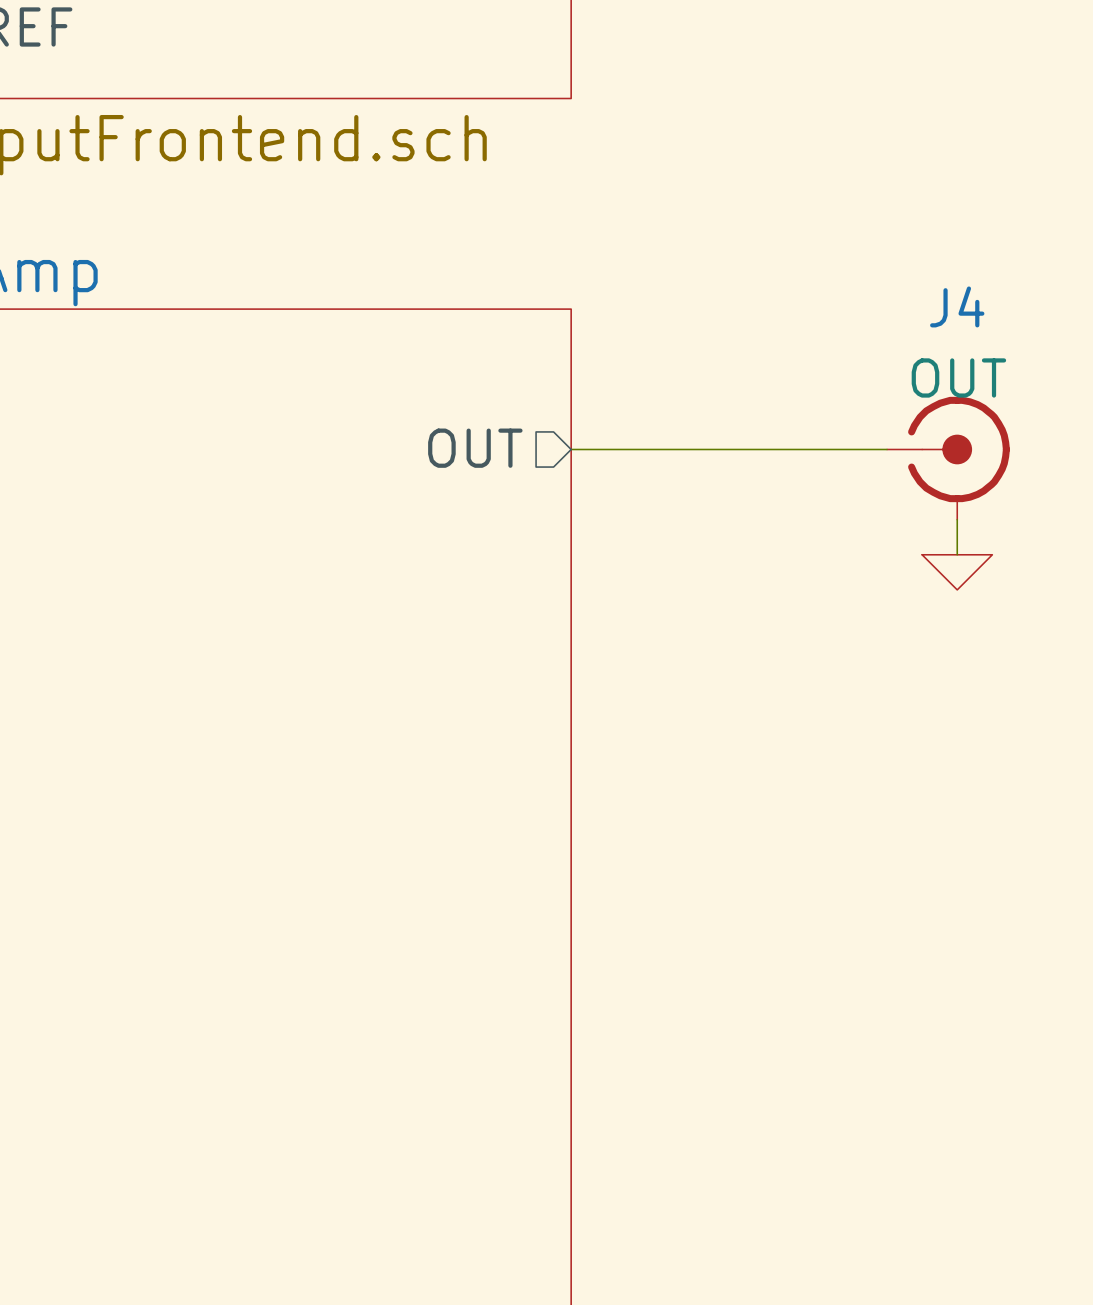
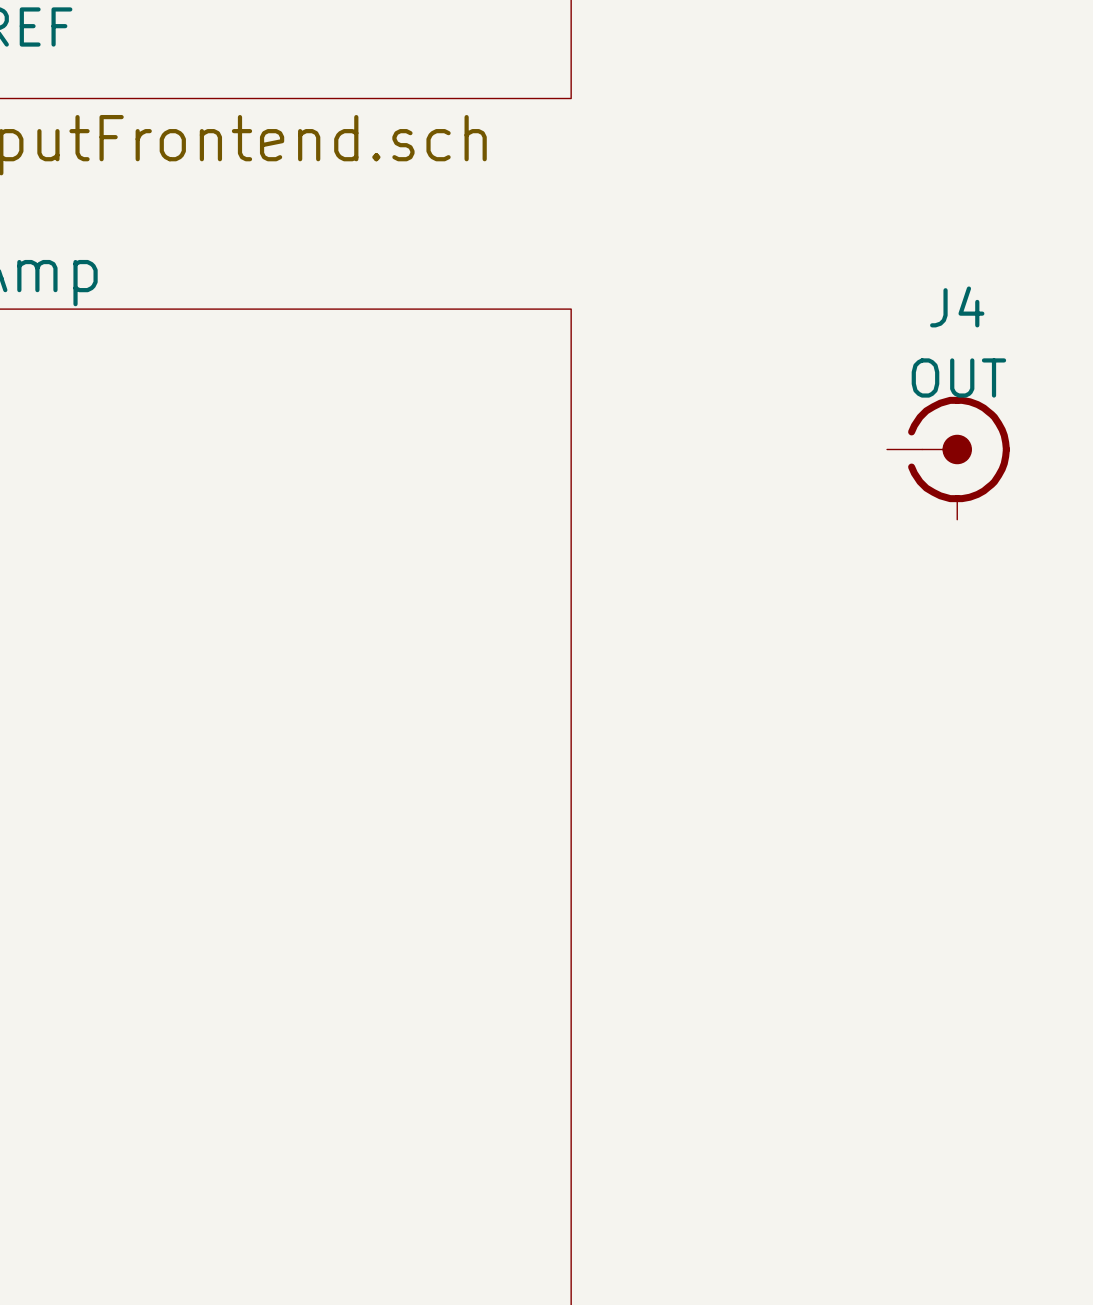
sheet pin: OUT (475, 448) -> none
wire: (571, 449) (887, 449) -> none
wire: (957, 519) (957, 554) -> none
power symbol: (957, 572) -> none

